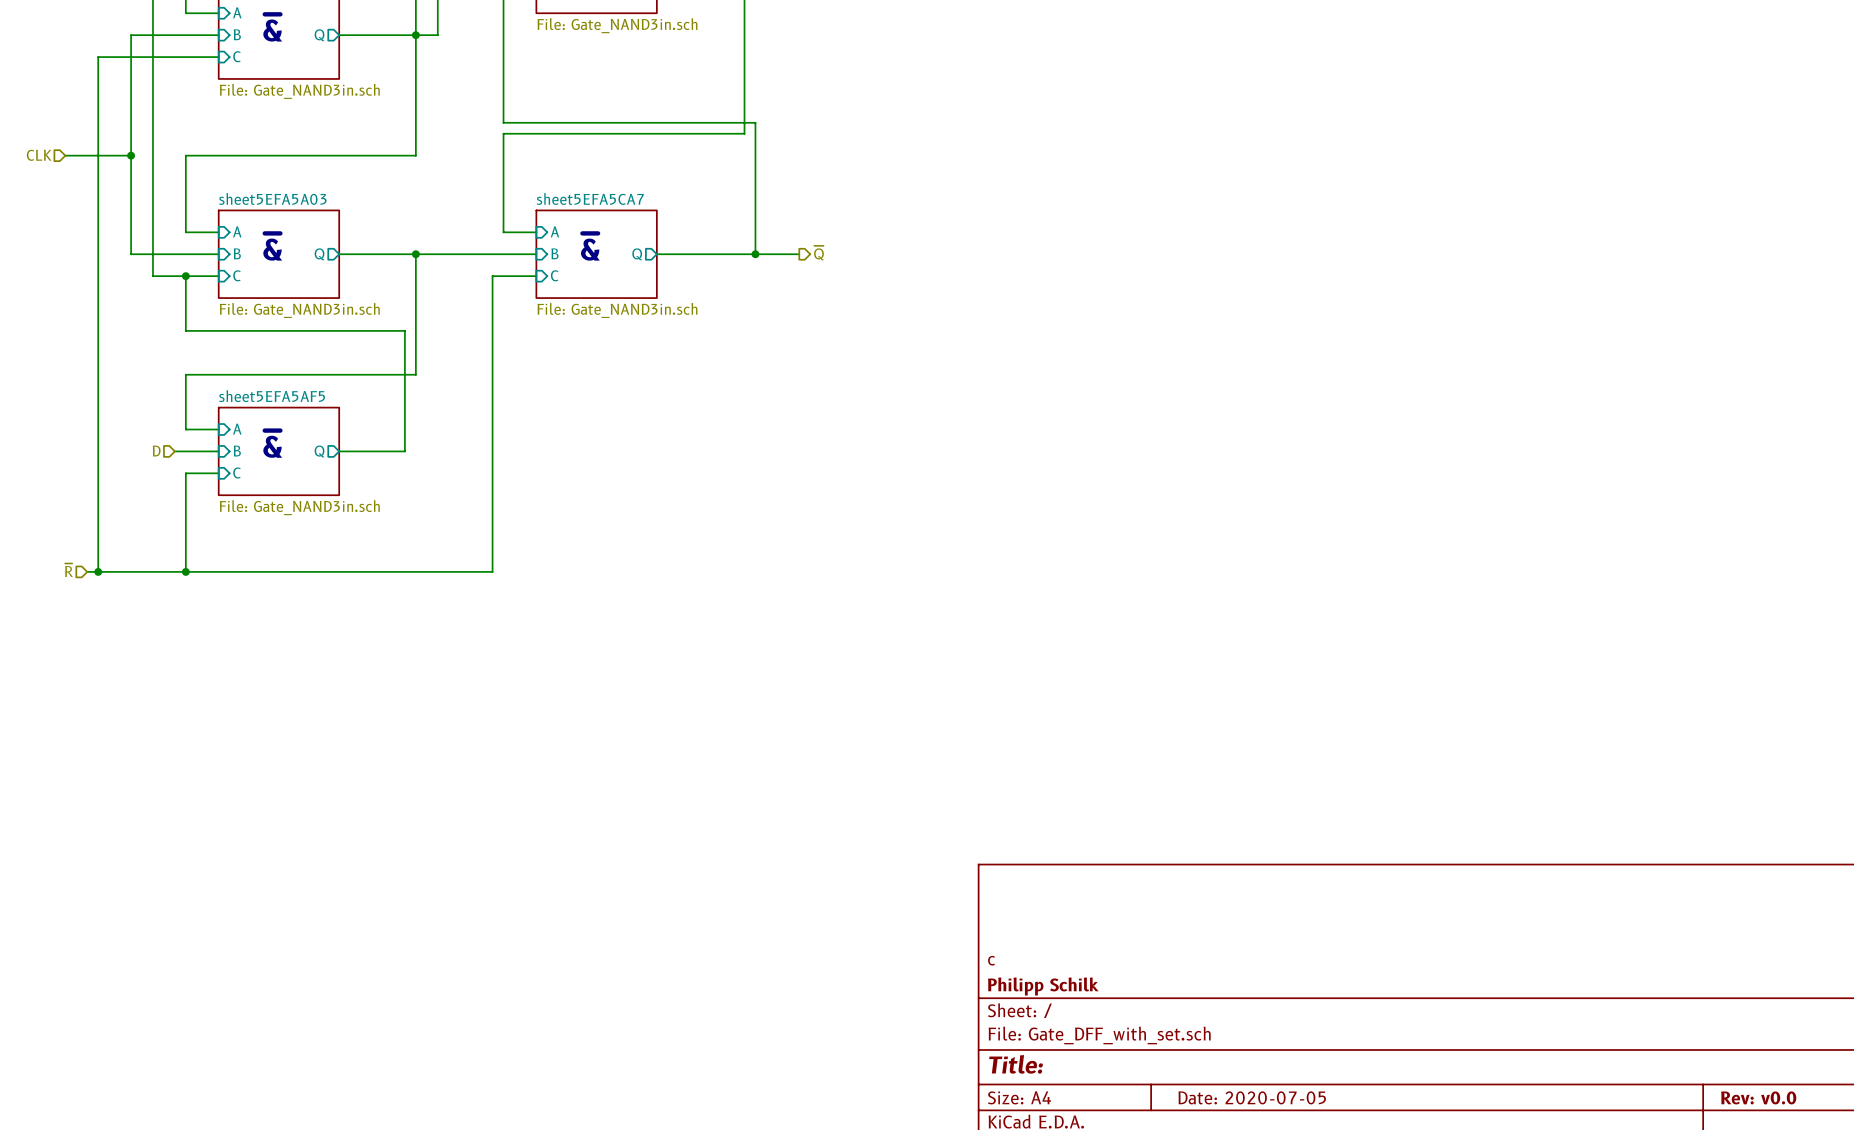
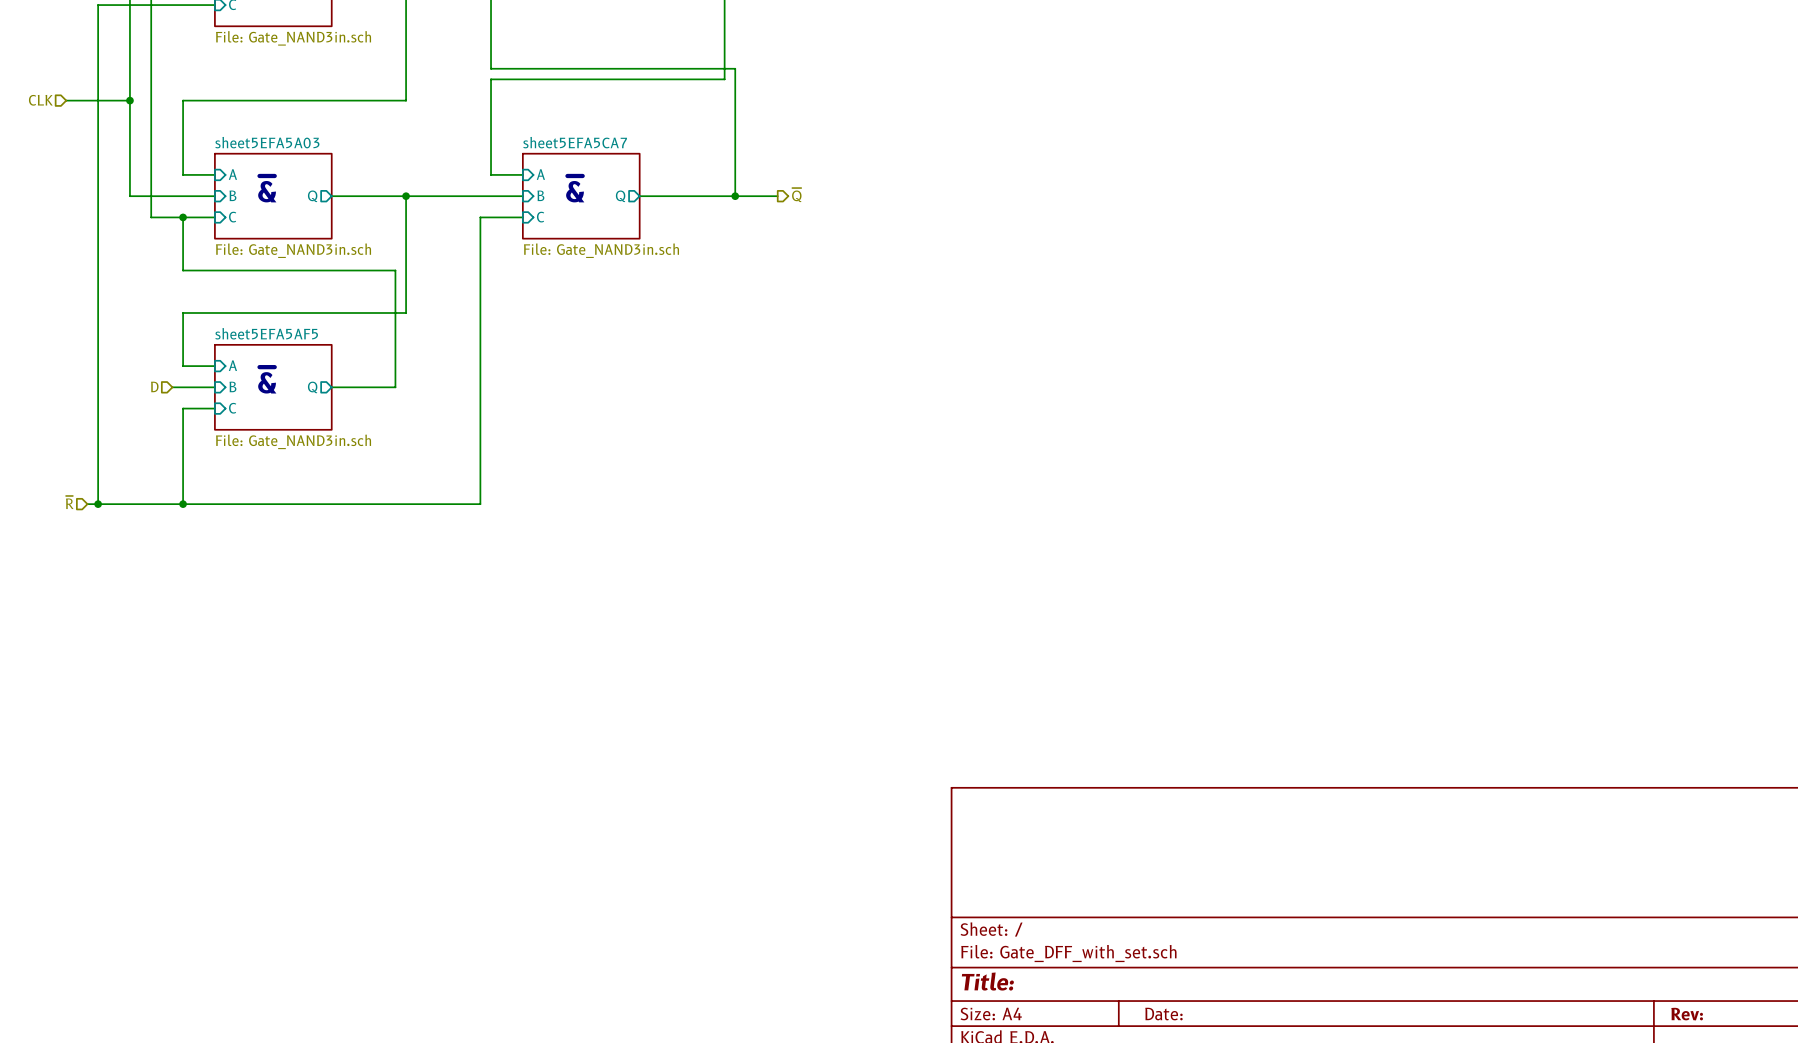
title block: c (991, 960) -> none
title block: Philipp Schilk (1043, 986) -> none
title block: Date: 2020-07-05 (1252, 1097) -> Date: (1163, 1014)
title block: Rev: v0.0 (1758, 1097) -> Rev: (1687, 1014)

